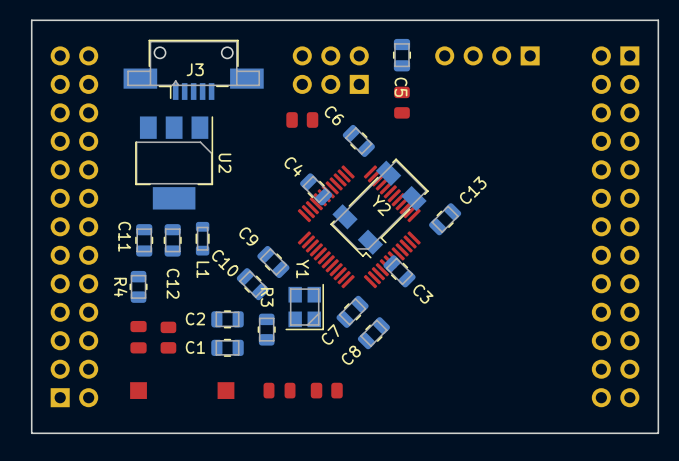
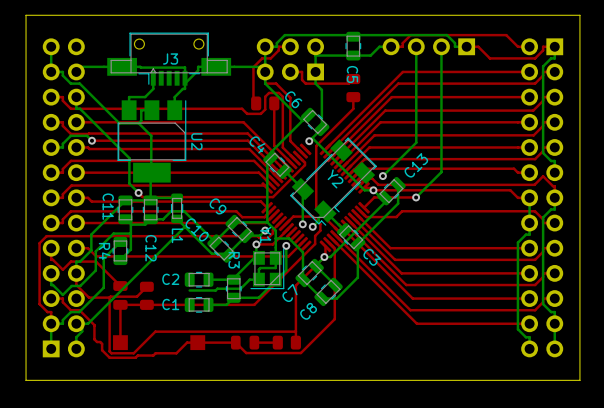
bottom track: none -> (51, 46) (51, 71) (62, 71) (62, 75) (70, 83) (79, 83) (119, 123) (138, 123)
top track: none -> (290, 46) (278, 46) (278, 50) (270, 58) (262, 58) (253, 67) (253, 100) (256, 103)
bottom track: none -> (315, 46) (315, 83) (321, 89) (321, 128) (309, 141)
bottom track: none -> (391, 46) (379, 46) (370, 55) (315, 55)
bottom track: none -> (416, 46) (416, 142) (382, 176)
bottom track: none -> (441, 46) (441, 172) (416, 197)
bottom track: none -> (466, 46) (454, 46) (454, 43) (446, 35) (354, 35) (353, 36) (351, 35) (284, 35) (276, 43) (276, 46) (265, 46) (265, 83) (302, 120)
top track: none -> (529, 46) (517, 46) (506, 35) (410, 35) (402, 43) (402, 46) (391, 46)
bottom track: none -> (554, 46) (554, 58) (551, 58) (543, 66) (543, 153) (551, 161) (554, 161) (554, 172)
top track: none -> (554, 46) (543, 46) (543, 50) (535, 58) (489, 58) (478, 46) (466, 46)
bottom track: none -> (76, 66) (185, 67) (185, 88) (174, 97) (174, 110)
bottom track: none -> (265, 66) (198, 66) (198, 70) (185, 83)
top track: none -> (265, 71) (265, 83) (276, 83) (290, 97) (290, 141) (302, 152)
top track: none -> (290, 71) (302, 71) (302, 79) (305, 83) (348, 83) (353, 79)
top track: none -> (529, 71) (402, 71) (325, 149)
top track: none -> (554, 71) (543, 71) (543, 75) (535, 83) (398, 83) (328, 152)
bottom track: none -> (153, 78) (153, 88) (145, 97) (129, 97) (129, 110)
top track: none -> (51, 97) (62, 97) (62, 100) (70, 108) (242, 108) (247, 113) (260, 113) (265, 109) (265, 96) (269, 92) (278, 92) (282, 96) (282, 147) (295, 159)
bottom track: none -> (76, 97) (76, 108) (80, 108) (129, 158) (129, 183) (138, 192)
top track: none -> (353, 97) (353, 108) (316, 145) (316, 209) (339, 232)
top track: none -> (529, 97) (391, 97) (332, 156)
top track: none -> (554, 97) (543, 97) (543, 100) (533, 110) (385, 110) (335, 159)
top track: none -> (274, 103) (274, 146) (291, 163)
bottom track: none -> (151, 110) (141, 110) (141, 120) (138, 123)
bottom track: none -> (302, 120) (270, 152) (270, 158) (267, 161) (267, 222)
top track: none -> (51, 122) (62, 122) (62, 125) (70, 133) (247, 133) (284, 170)
top track: none -> (76, 122) (243, 122) (288, 166)
top track: none -> (529, 122) (380, 122) (339, 163)
top track: none -> (554, 122) (543, 122) (543, 125) (533, 135) (374, 135) (343, 166)
bottom track: none -> (138, 123) (151, 135) (151, 173)
bottom track: none -> (312, 138) (364, 190) (373, 190) (384, 201) (330, 257) (324, 257) (316, 265) (335, 285)
bottom track: none -> (91, 140) (87, 135) (70, 135) (62, 143) (62, 147) (51, 147)
top track: none -> (91, 140) (247, 140) (281, 173)
via: none -> (91, 140)
via: none -> (309, 141)
top track: none -> (76, 147) (249, 149) (277, 177)
top track: none -> (529, 147) (369, 147) (346, 170)
top track: none -> (554, 147) (543, 147) (543, 151) (535, 159) (364, 159) (350, 173)
top track: none -> (298, 156) (305, 165) (273, 197) (142, 197) (138, 192)
bottom track: none -> (284, 171) (302, 189) (302, 224)
top track: none -> (51, 172) (62, 172) (62, 169) (71, 160) (254, 160) (274, 180)
top track: none -> (76, 172) (258, 172) (270, 184)
bottom track: none -> (151, 172) (150, 200)
top track: none -> (529, 172) (517, 172) (513, 168) (362, 168) (353, 177)
via: none -> (382, 176)
top track: none -> (360, 184) (366, 178) (372, 178) (378, 184) (534, 184) (543, 176) (554, 186) (554, 197)
top track: none -> (267, 187) (264, 185) (71, 185) (62, 194) (62, 197) (51, 197)
top track: none -> (364, 187) (371, 187) (373, 190) (510, 190) (517, 197) (529, 197)
bottom track: none -> (398, 188) (398, 203) (357, 243) (357, 277) (336, 298) (321, 298) (302, 279) (302, 252) (289, 238) (275, 238)
via: none -> (373, 190)
via: none -> (138, 192)
top track: none -> (76, 197) (88, 197) (91, 201) (260, 201) (267, 207)
bottom track: none -> (177, 197) (153, 197) (150, 200)
top track: none -> (416, 197) (374, 197) (364, 207)
via: none -> (416, 197)
bottom track: none -> (529, 197) (529, 234) (525, 234) (517, 242) (517, 329) (525, 337) (529, 337) (529, 348)
bottom track: none -> (554, 197) (554, 209) (551, 209) (543, 217) (543, 304) (551, 312) (554, 312) (554, 348)
bottom track: none -> (150, 200) (125, 200) (91, 234) (91, 250) (80, 261) (76, 261) (76, 273)
top track: none -> (270, 211) (264, 217) (242, 217) (236, 211) (70, 211) (62, 219) (62, 223) (51, 223)
top track: none -> (360, 211) (366, 217) (396, 217) (402, 211) (534, 211) (543, 219) (543, 223) (554, 223)
top track: none -> (274, 214) (265, 223) (76, 223)
top track: none -> (357, 214) (390, 248) (529, 248)
top track: none -> (353, 218) (395, 259) (535, 259) (543, 251) (543, 248) (554, 248)
bottom track: none -> (177, 218) (211, 253) (228, 253)
top track: none -> (281, 221) (268, 237) (257, 236) (46, 236) (39, 243) (39, 304) (47, 312) (51, 312) (51, 323)
top track: none -> (350, 221) (401, 273) (529, 273)
bottom track: none -> (267, 222) (233, 222) (214, 241) (184, 211) (171, 211) (163, 219) (150, 219) (145, 224) (130, 224) (130, 249) (120, 260)
bottom track: none -> (267, 222) (275, 230) (275, 268) (260, 268) (258, 279) (249, 279) (240, 288) (189, 290)
via: none -> (302, 224)
top track: none -> (284, 225) (293, 216) (312, 216) (320, 224) (320, 230) (315, 235) (315, 244) (254, 304) (120, 304) (120, 342)
top track: none -> (346, 225) (406, 285) (535, 285) (543, 277) (543, 273) (554, 273)
bottom track: none -> (184, 226) (88, 323) (76, 323)
bottom track: none -> (312, 226) (325, 211) (344, 230)
via: none -> (312, 226)
top track: none -> (288, 228) (272, 244) (256, 244)
top track: none -> (343, 228) (412, 298) (529, 298)
bottom track: none -> (265, 230) (260, 235) (246, 235) (228, 253)
via: none -> (265, 230)
bottom track: none -> (130, 233) (113, 233) (95, 251) (95, 270) (80, 285) (71, 285) (62, 294) (51, 285) (51, 273)
top track: none -> (335, 235) (410, 310) (535, 310) (543, 302) (543, 298) (554, 298)
top track: none -> (332, 239) (416, 323) (529, 323)
bottom track: none -> (120, 241) (103, 258) (103, 287) (79, 312) (70, 312) (62, 320) (62, 323) (51, 323) (51, 348)
top track: none -> (302, 242) (288, 256) (96, 256) (88, 248) (76, 248)
top track: none -> (328, 242) (334, 248) (334, 319) (300, 353) (246, 353) (235, 342) (187, 342) (176, 353) (155, 353) (153, 355) (137, 355) (135, 357) (109, 357) (102, 350) (102, 343) (94, 339) (94, 325) (79, 310) (70, 310) (62, 302) (62, 298) (51, 298)
bottom track: none -> (256, 244) (256, 255) (258, 257) (254, 257) (233, 279) (208, 279)
via: none -> (256, 244)
bottom track: none -> (286, 245) (286, 270) (258, 297) (233, 297) (226, 304) (208, 304)
via: none -> (286, 245)
top track: none -> (325, 246) (325, 255) (295, 285) (295, 342)
top track: none -> (51, 248) (51, 259) (62, 269) (71, 261) (96, 261) (120, 286)
via: none -> (324, 257)
top track: none -> (76, 273) (76, 285) (88, 297) (109, 297)
top track: none -> (146, 286) (136, 296) (109, 297)
top track: none -> (109, 297) (109, 351) (111, 353) (133, 353) (155, 331) (295, 331)
bottom track: none -> (82, 323) (82, 331) (76, 337) (76, 348)
top track: none -> (277, 342) (254, 342)

